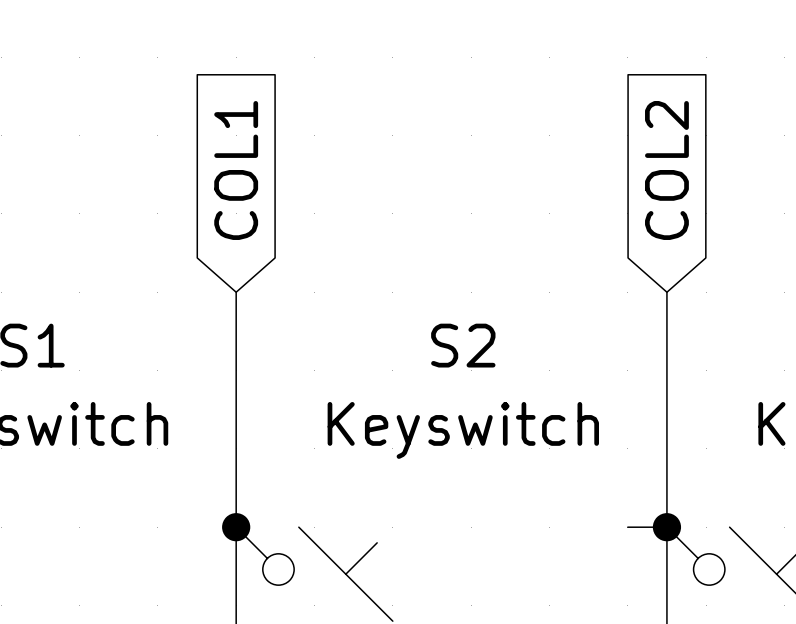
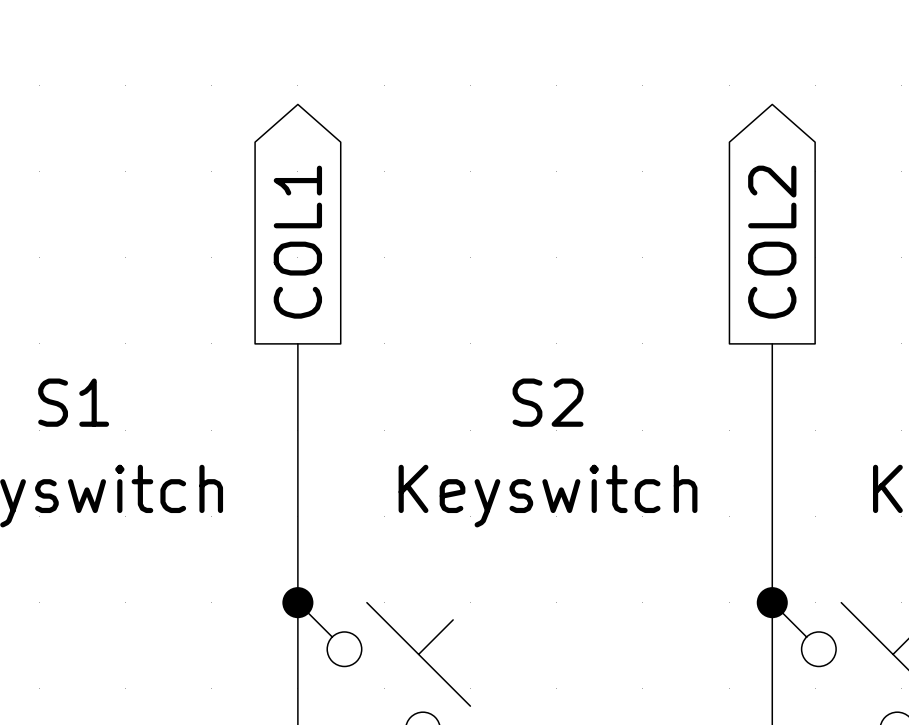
global label shape: input (236, 170) -> output (297, 242)
global label shape: input (666, 170) -> output (772, 242)
wire: (627, 527) (666, 527) -> none

